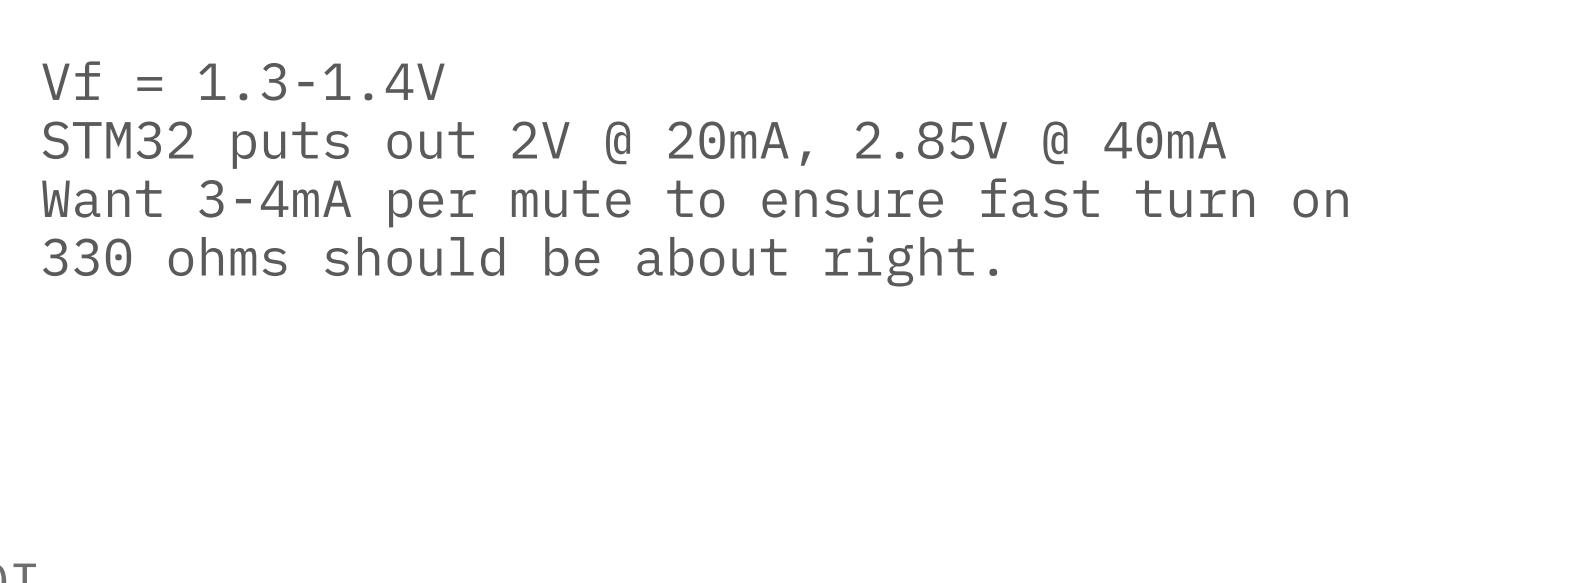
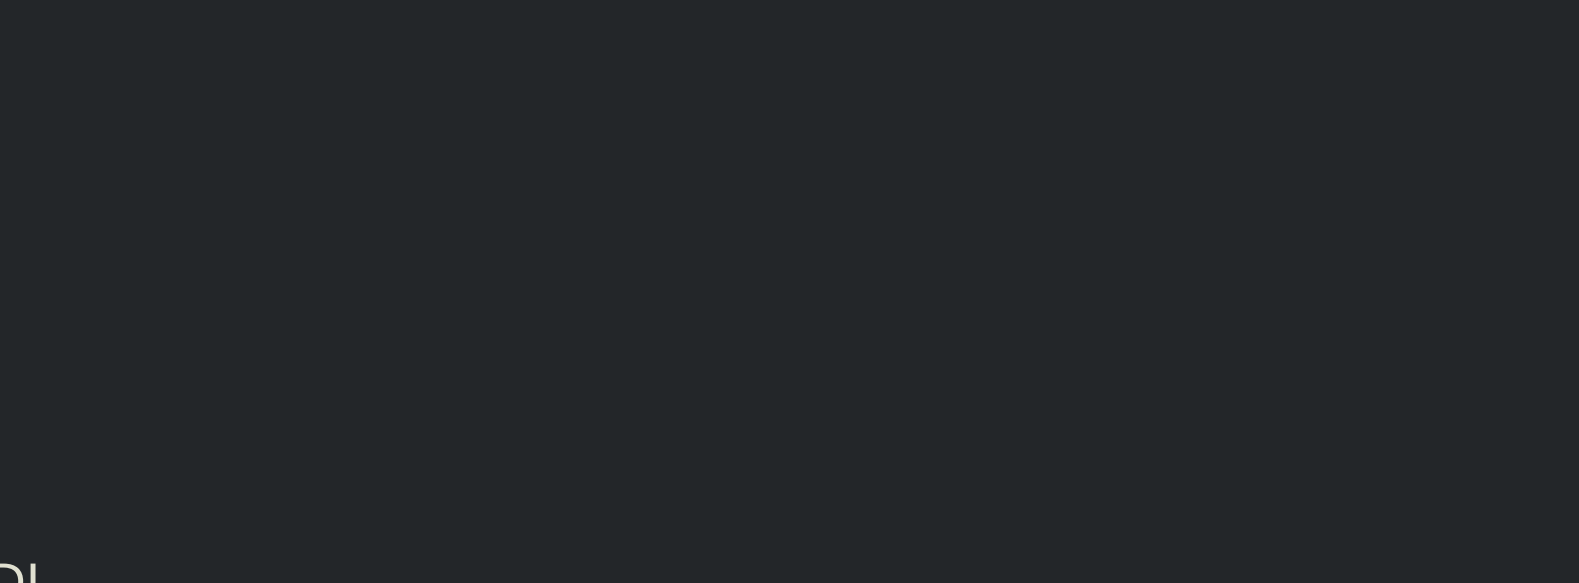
text: Vf = 1.3-1.4V (243, 80) -> none
text: STM32 puts out 2V @ 20mA, 2.85V @ 40mA (634, 145) -> none
text: Want 3-4mA per mute to ensure fast turn on (695, 202) -> none
text: 330 ohms should be about right. (520, 261) -> none

